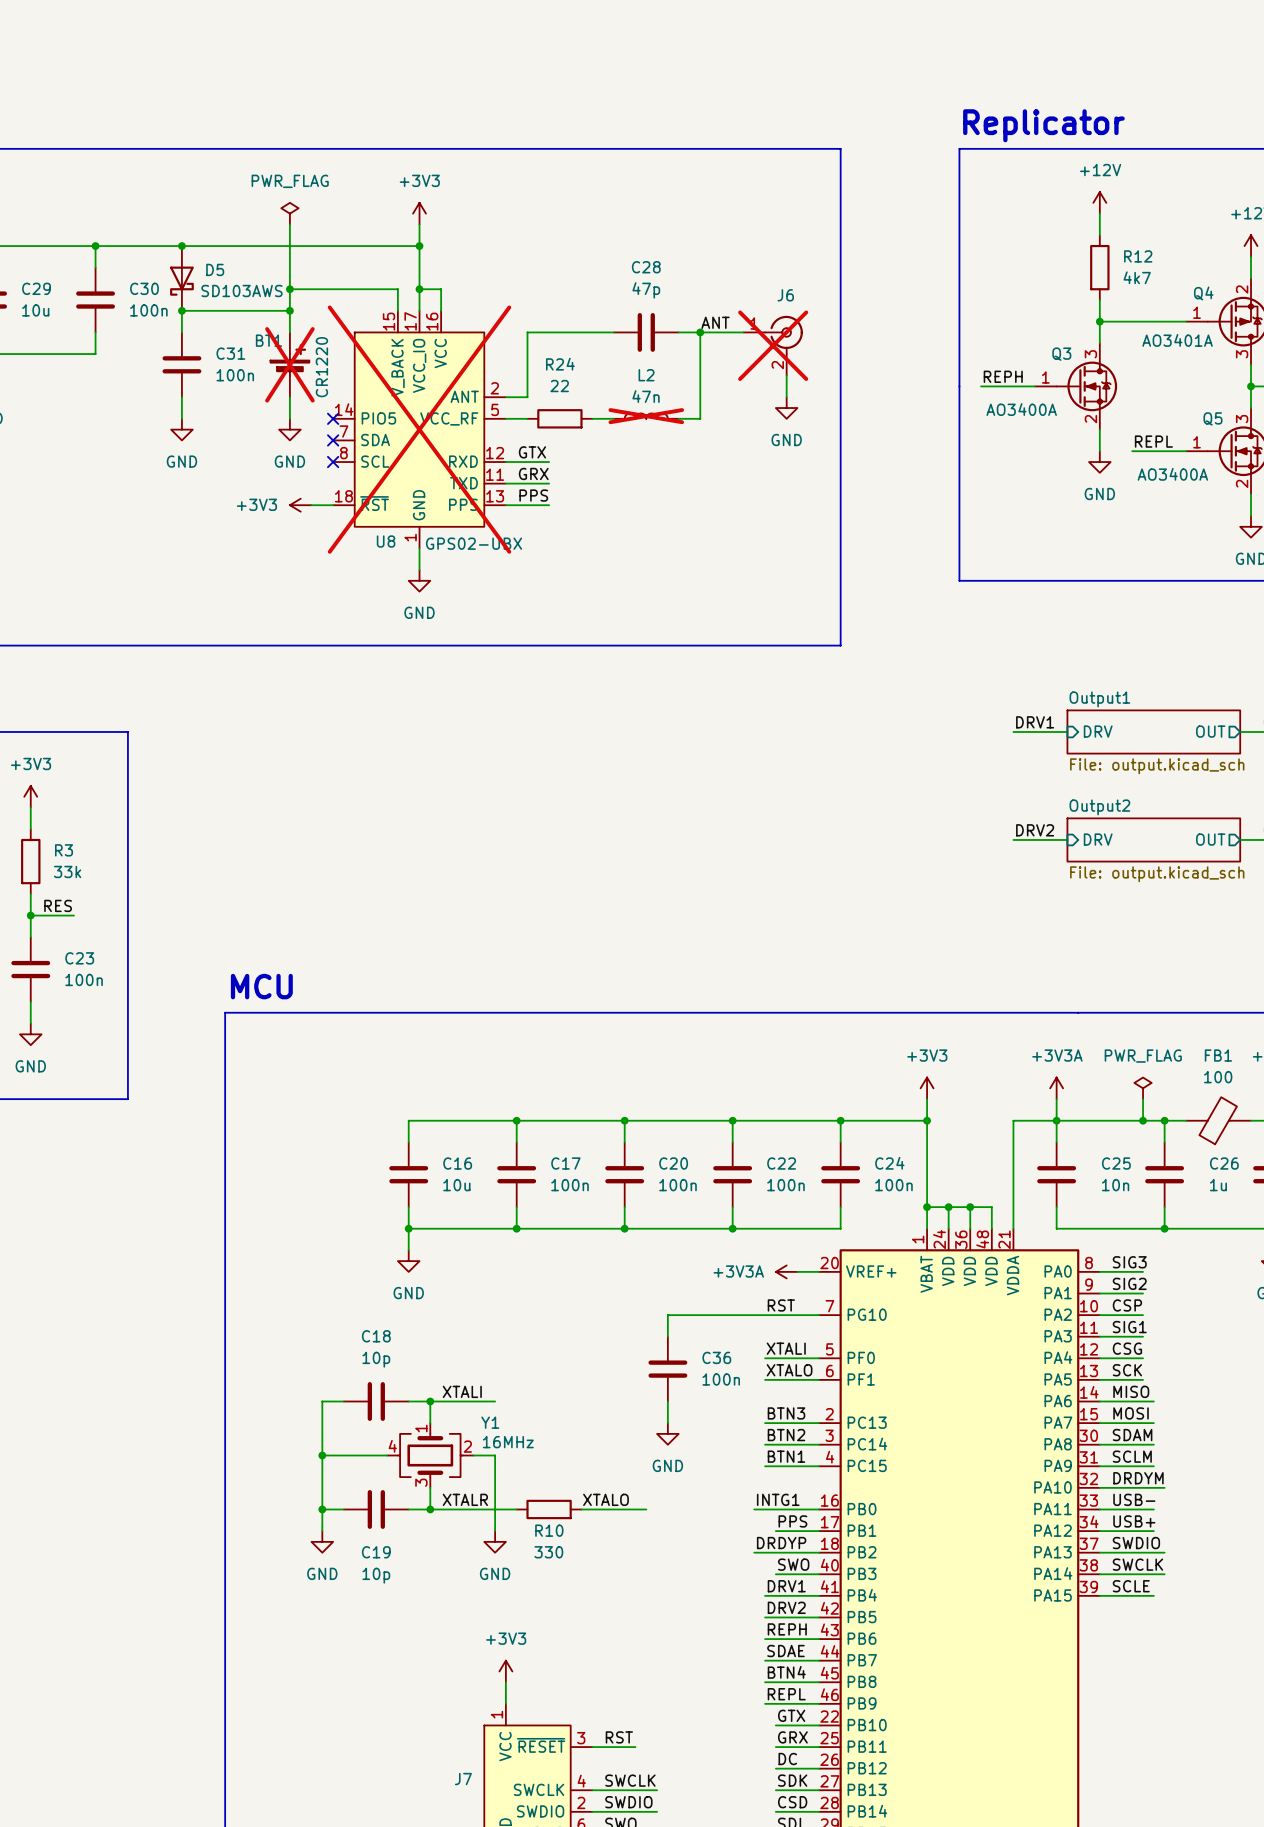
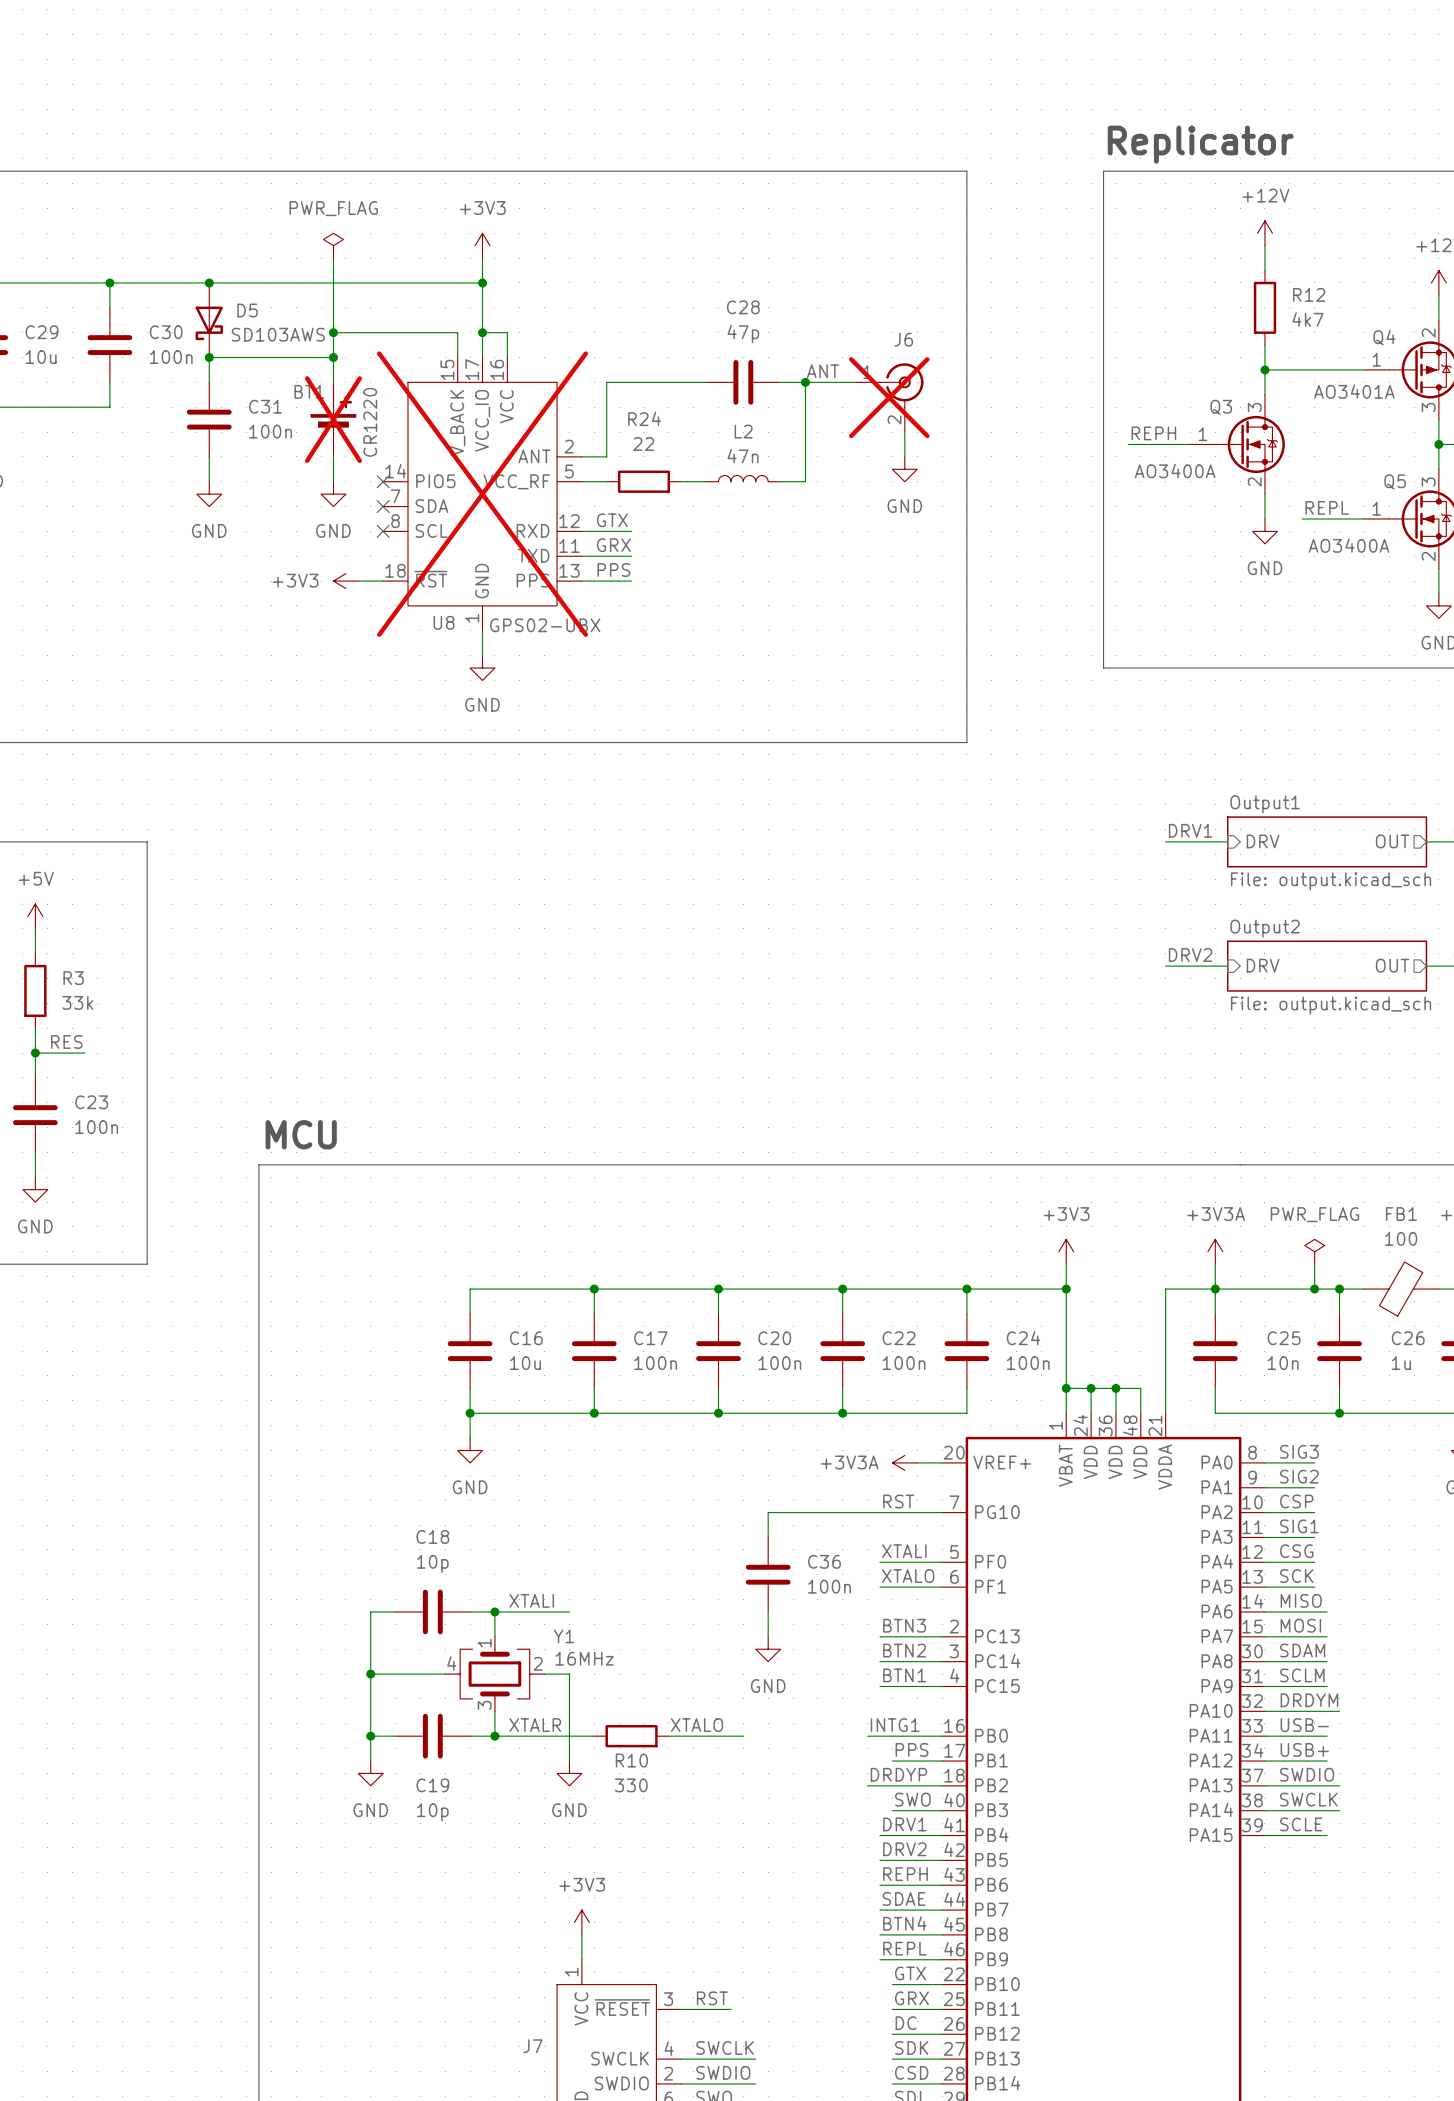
L2 do-not-place cross: (646, 416) -> none
power symbol: +3V3 (30, 796) -> +5V (35, 916)

